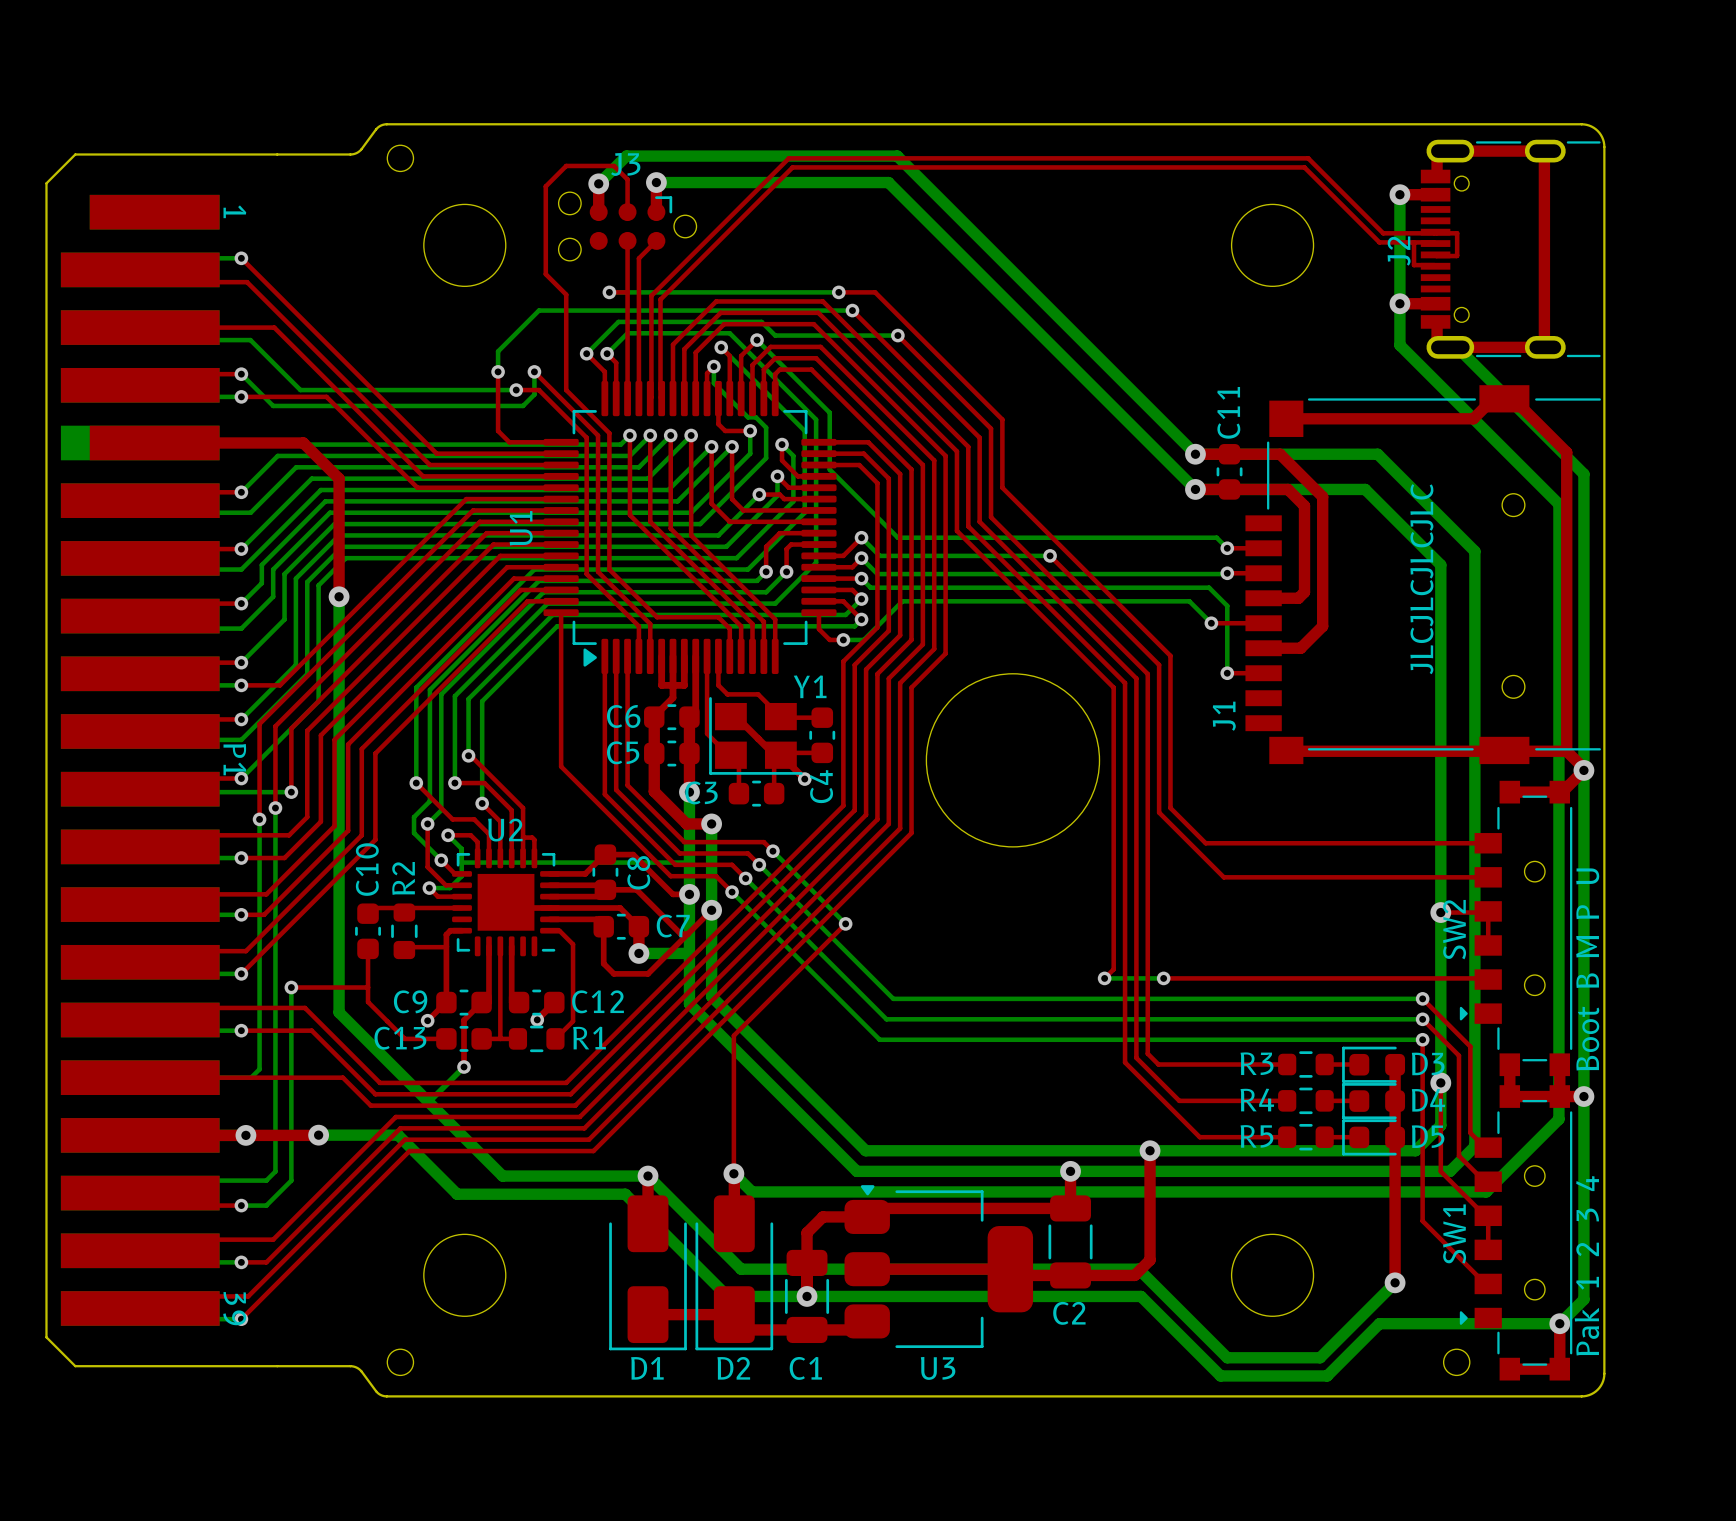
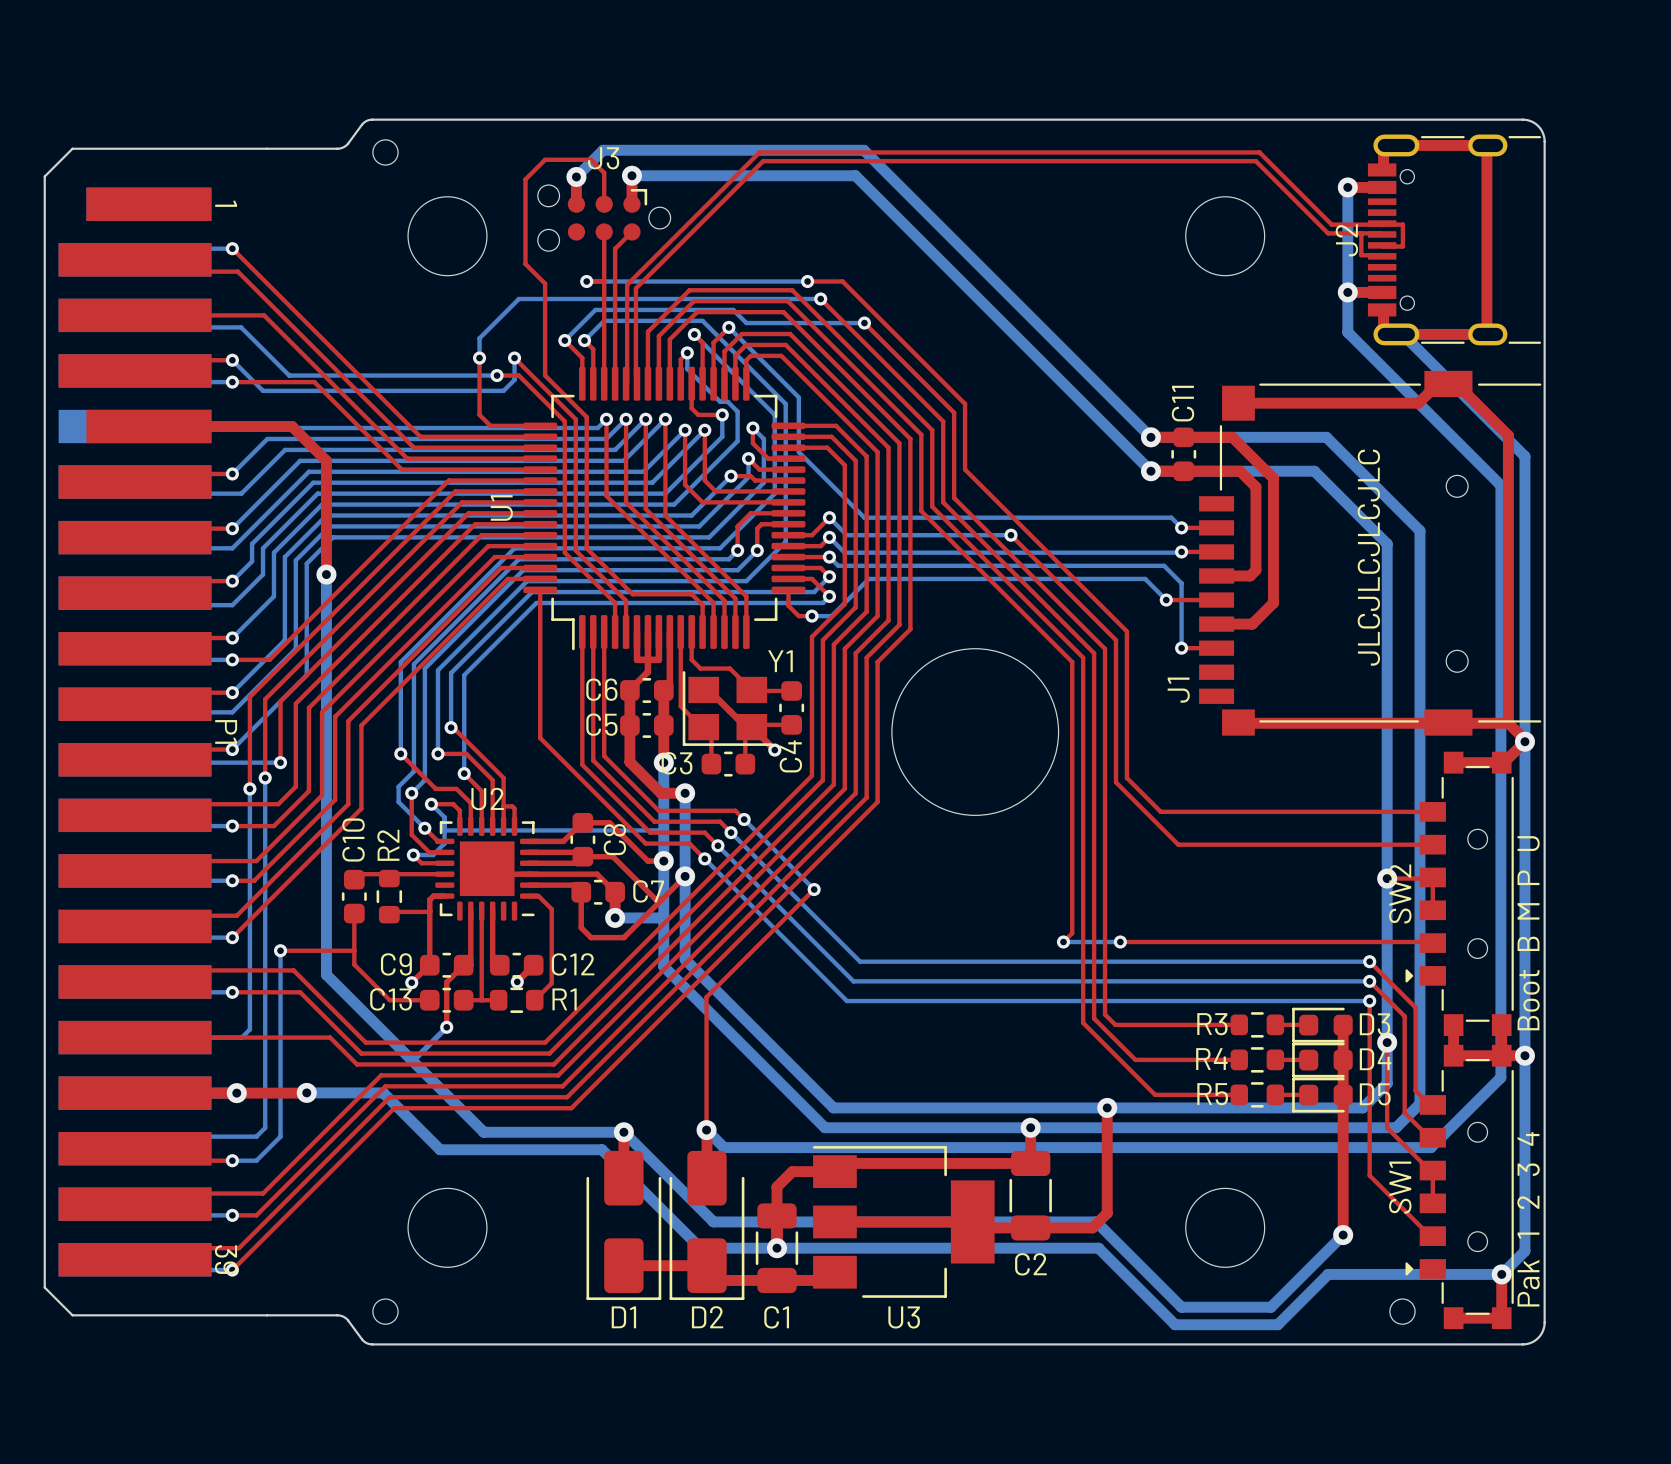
U1 footprint: [543, 380, 837, 675] -> [523, 366, 806, 651]
U3 footprint: [844, 1185, 1034, 1349] -> [812, 1146, 995, 1298]

